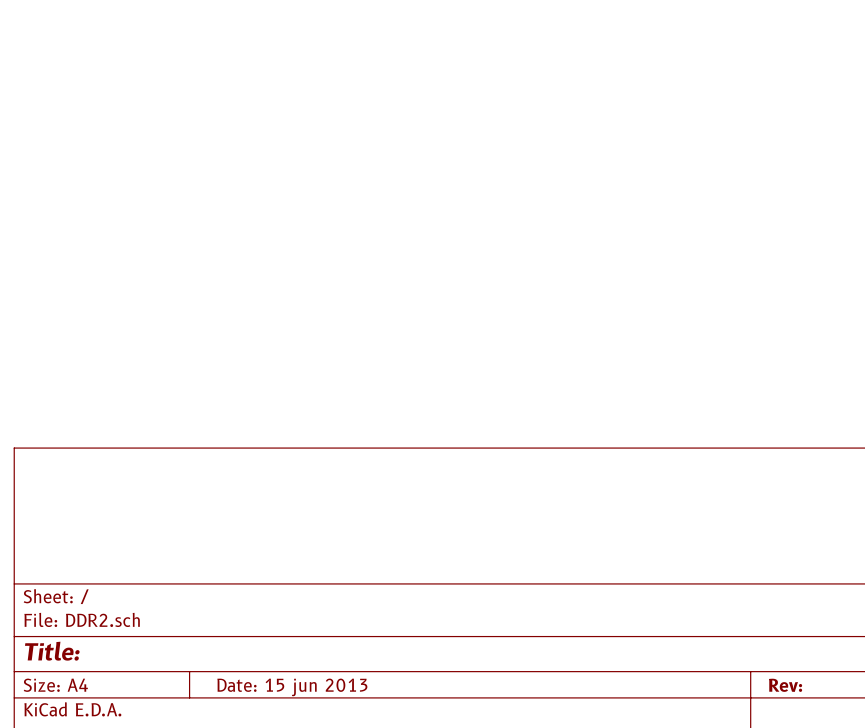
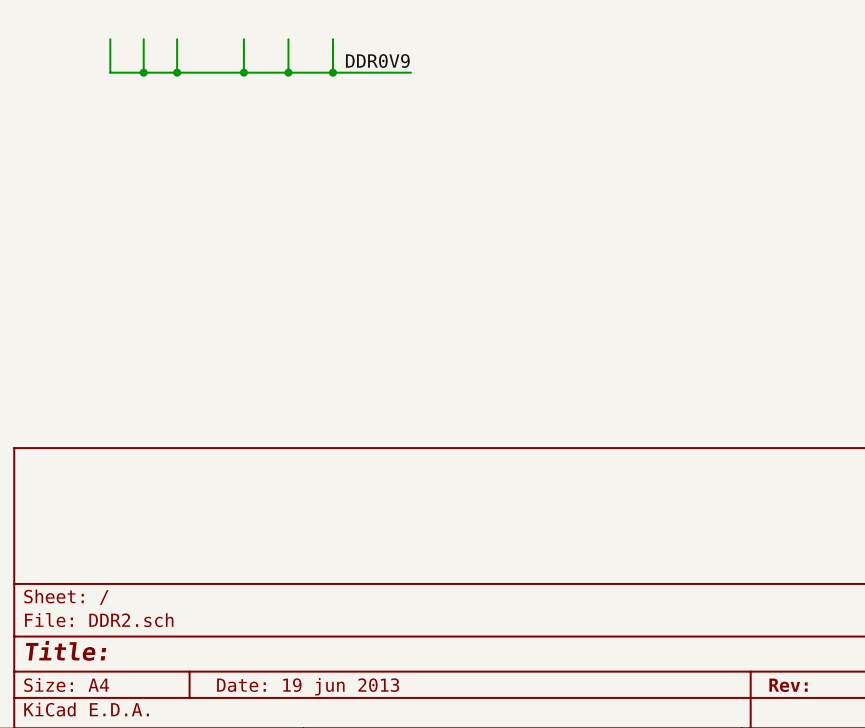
wire: none -> (110, 39) (110, 72) (410, 72)
wire: none -> (143, 39) (143, 72)
wire: none -> (177, 39) (177, 72)
wire: none -> (243, 39) (243, 72)
wire: none -> (288, 39) (288, 72)
wire: none -> (333, 39) (333, 72)
label: none -> DDR0V9 (377, 61)
junction: none -> (143, 72)
junction: none -> (177, 72)
junction: none -> (243, 72)
junction: none -> (288, 72)
junction: none -> (333, 72)
title block: Date: 15 jun 2013 (292, 687) -> Date: 19 jun 2013 (308, 686)

